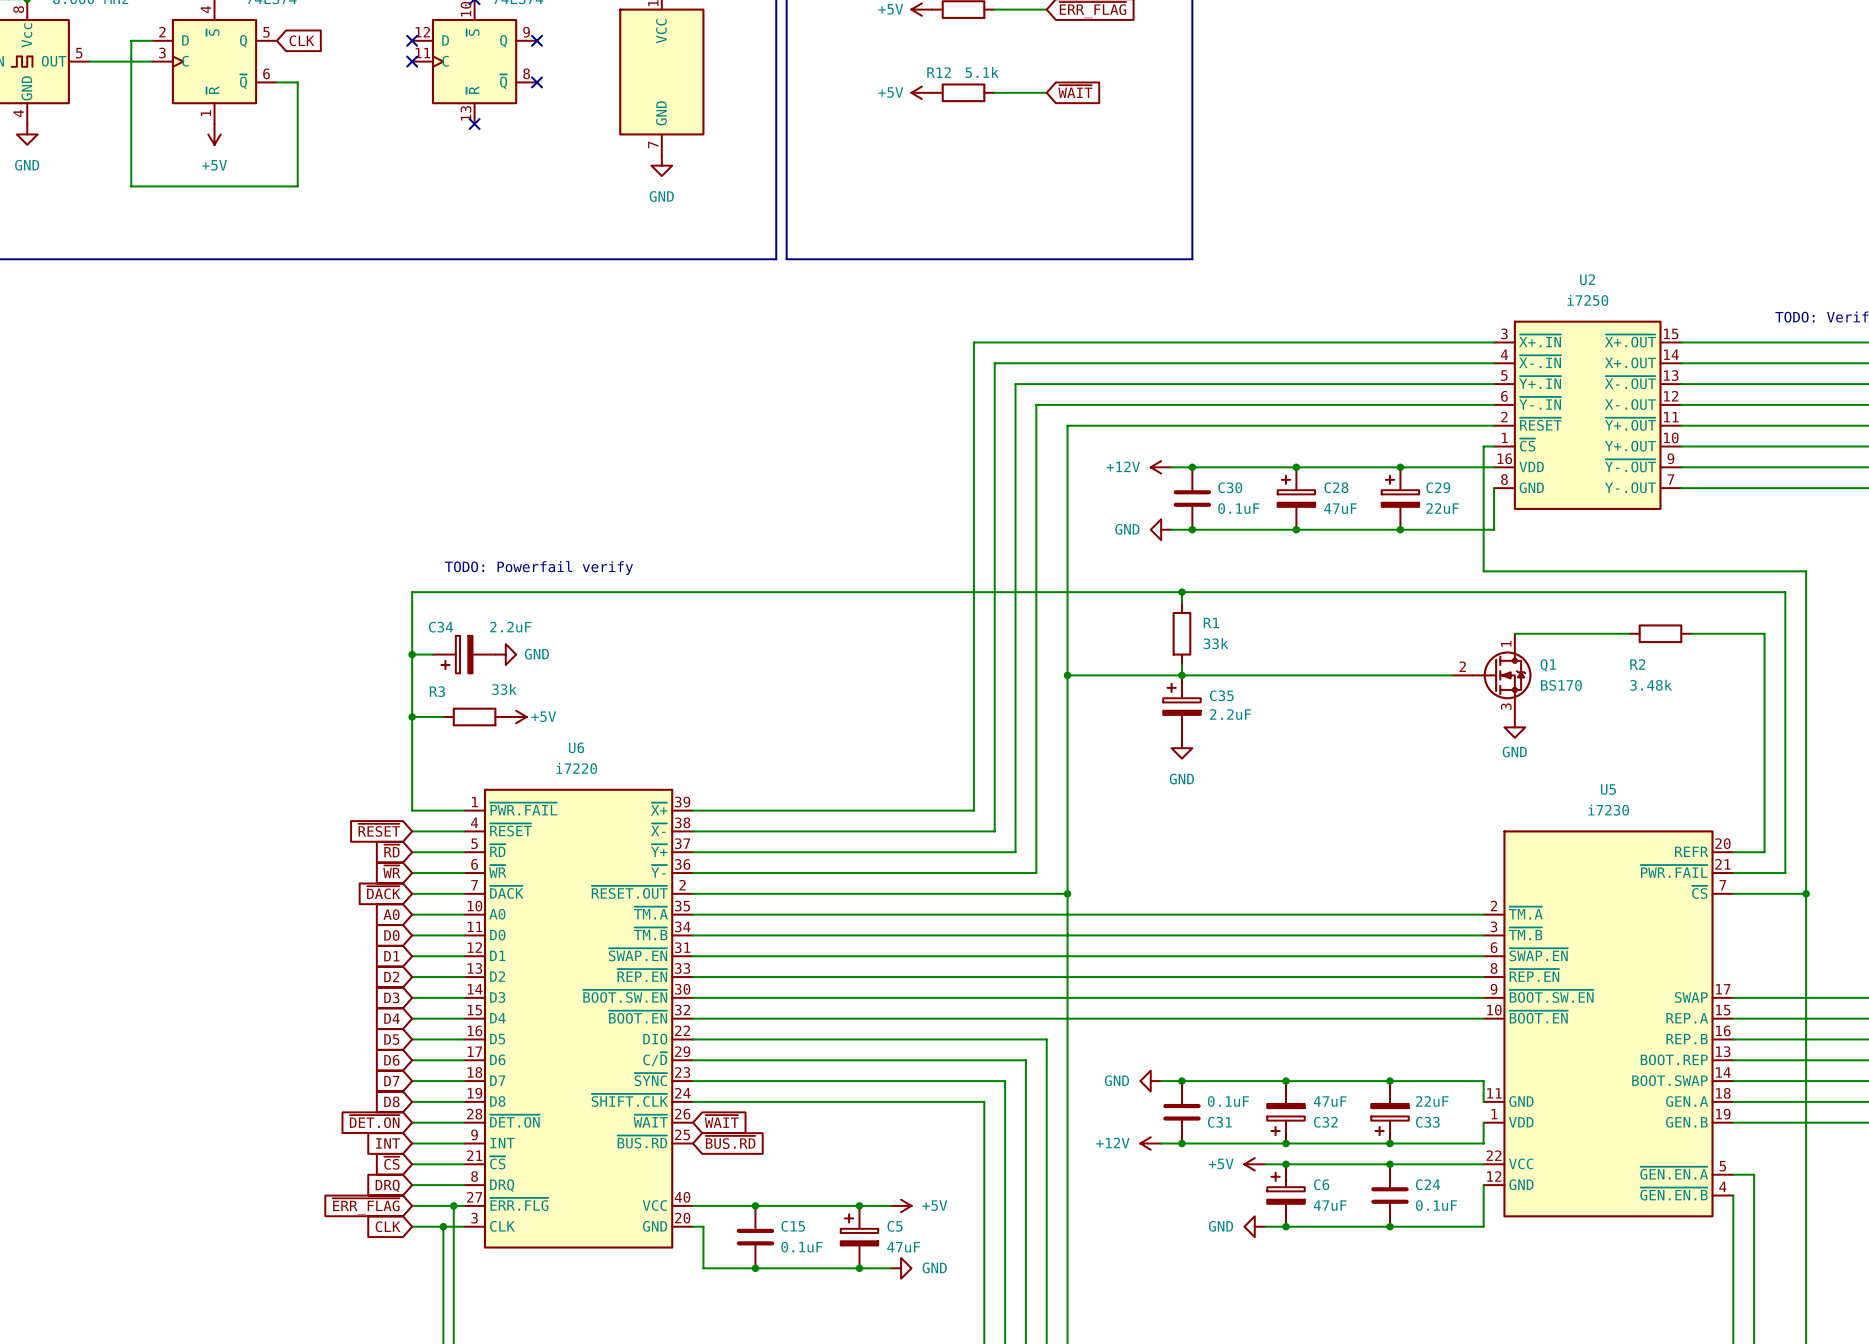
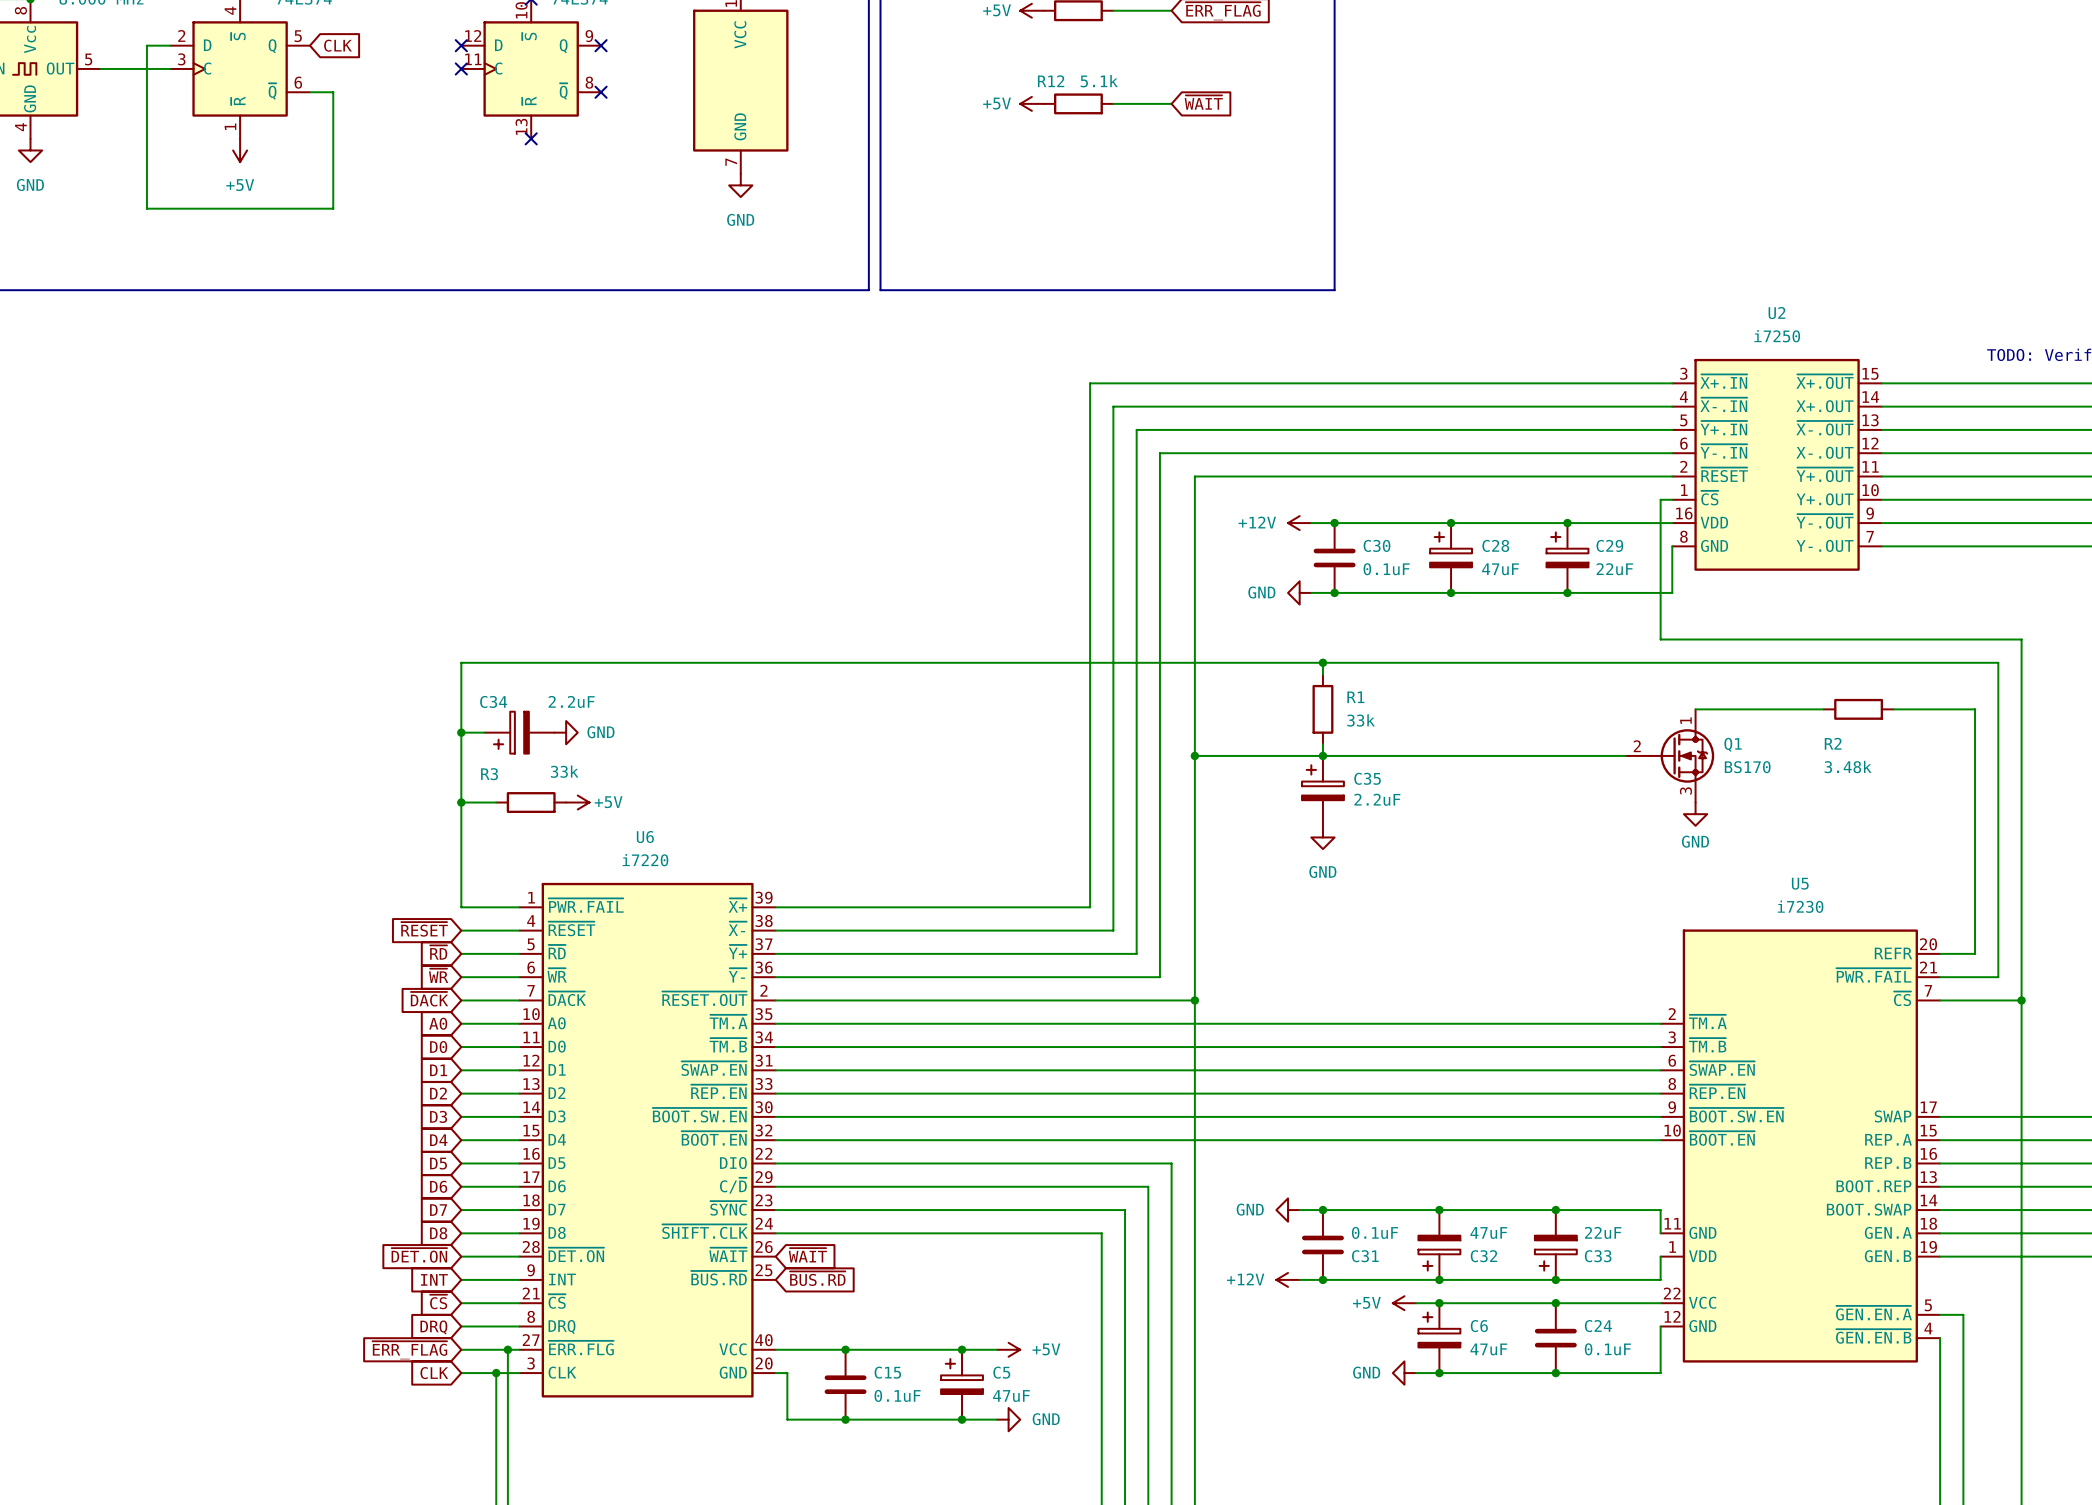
text: TODO: Powerfail verify (538, 568) -> none

